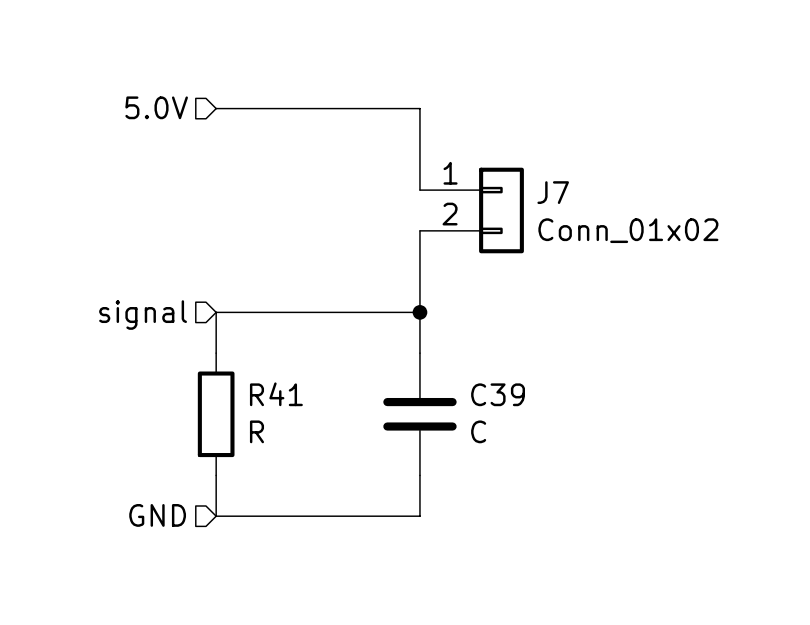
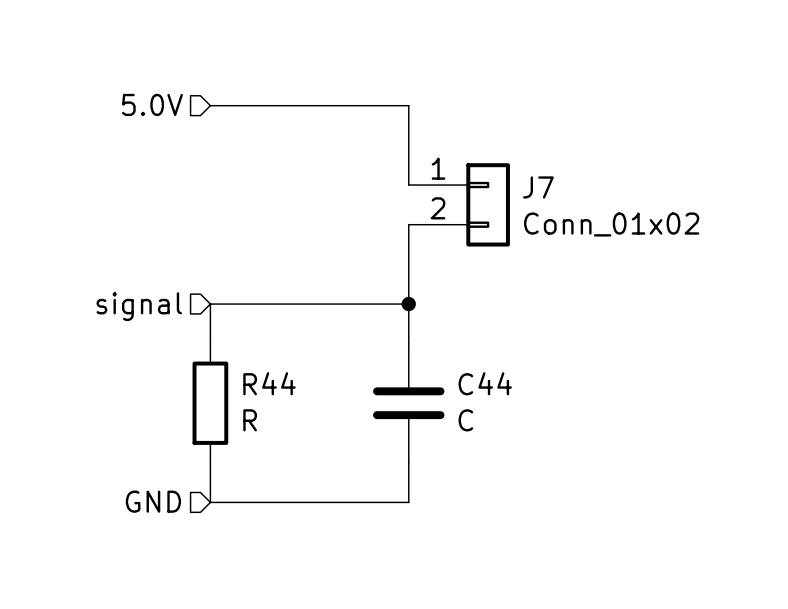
R41 name: R41 (276, 394) -> R44 (269, 383)
C39 name: C39 (498, 394) -> C44 (485, 383)

